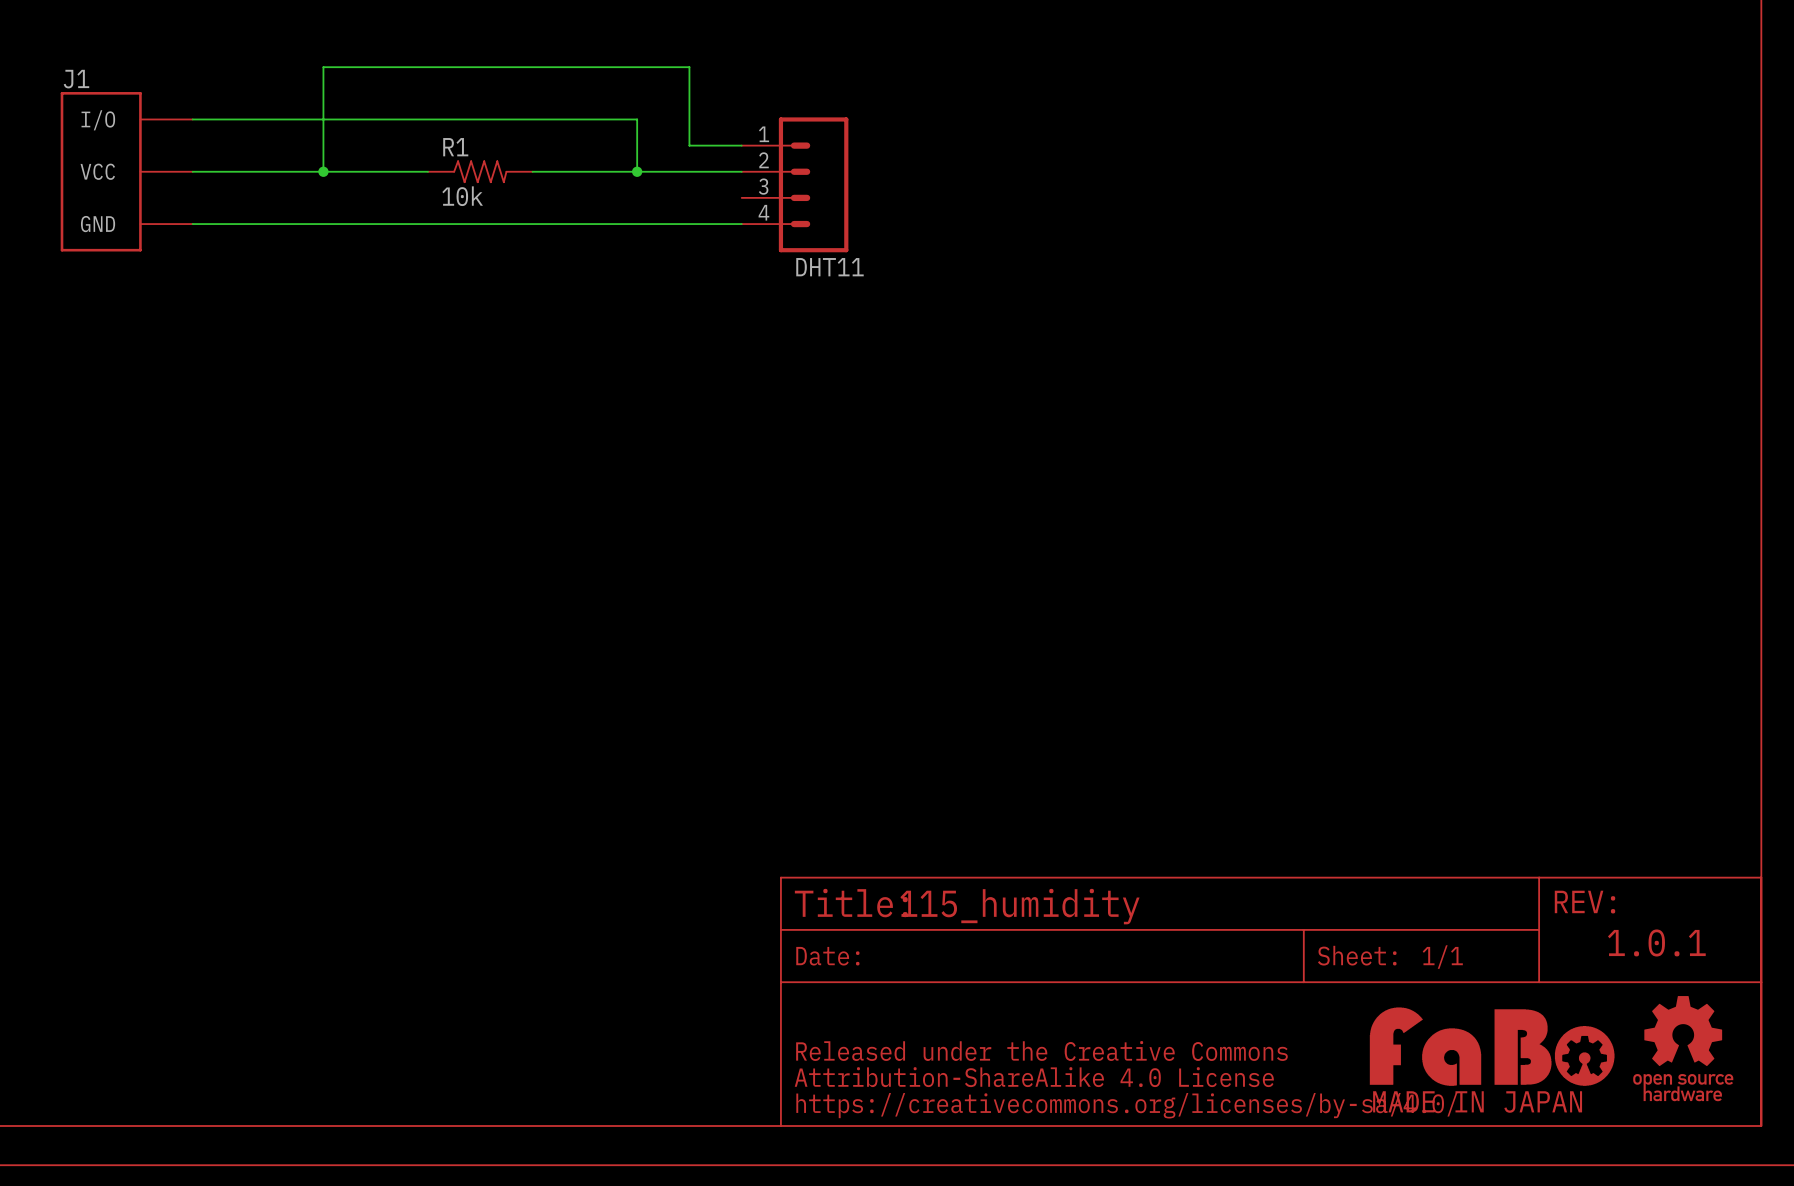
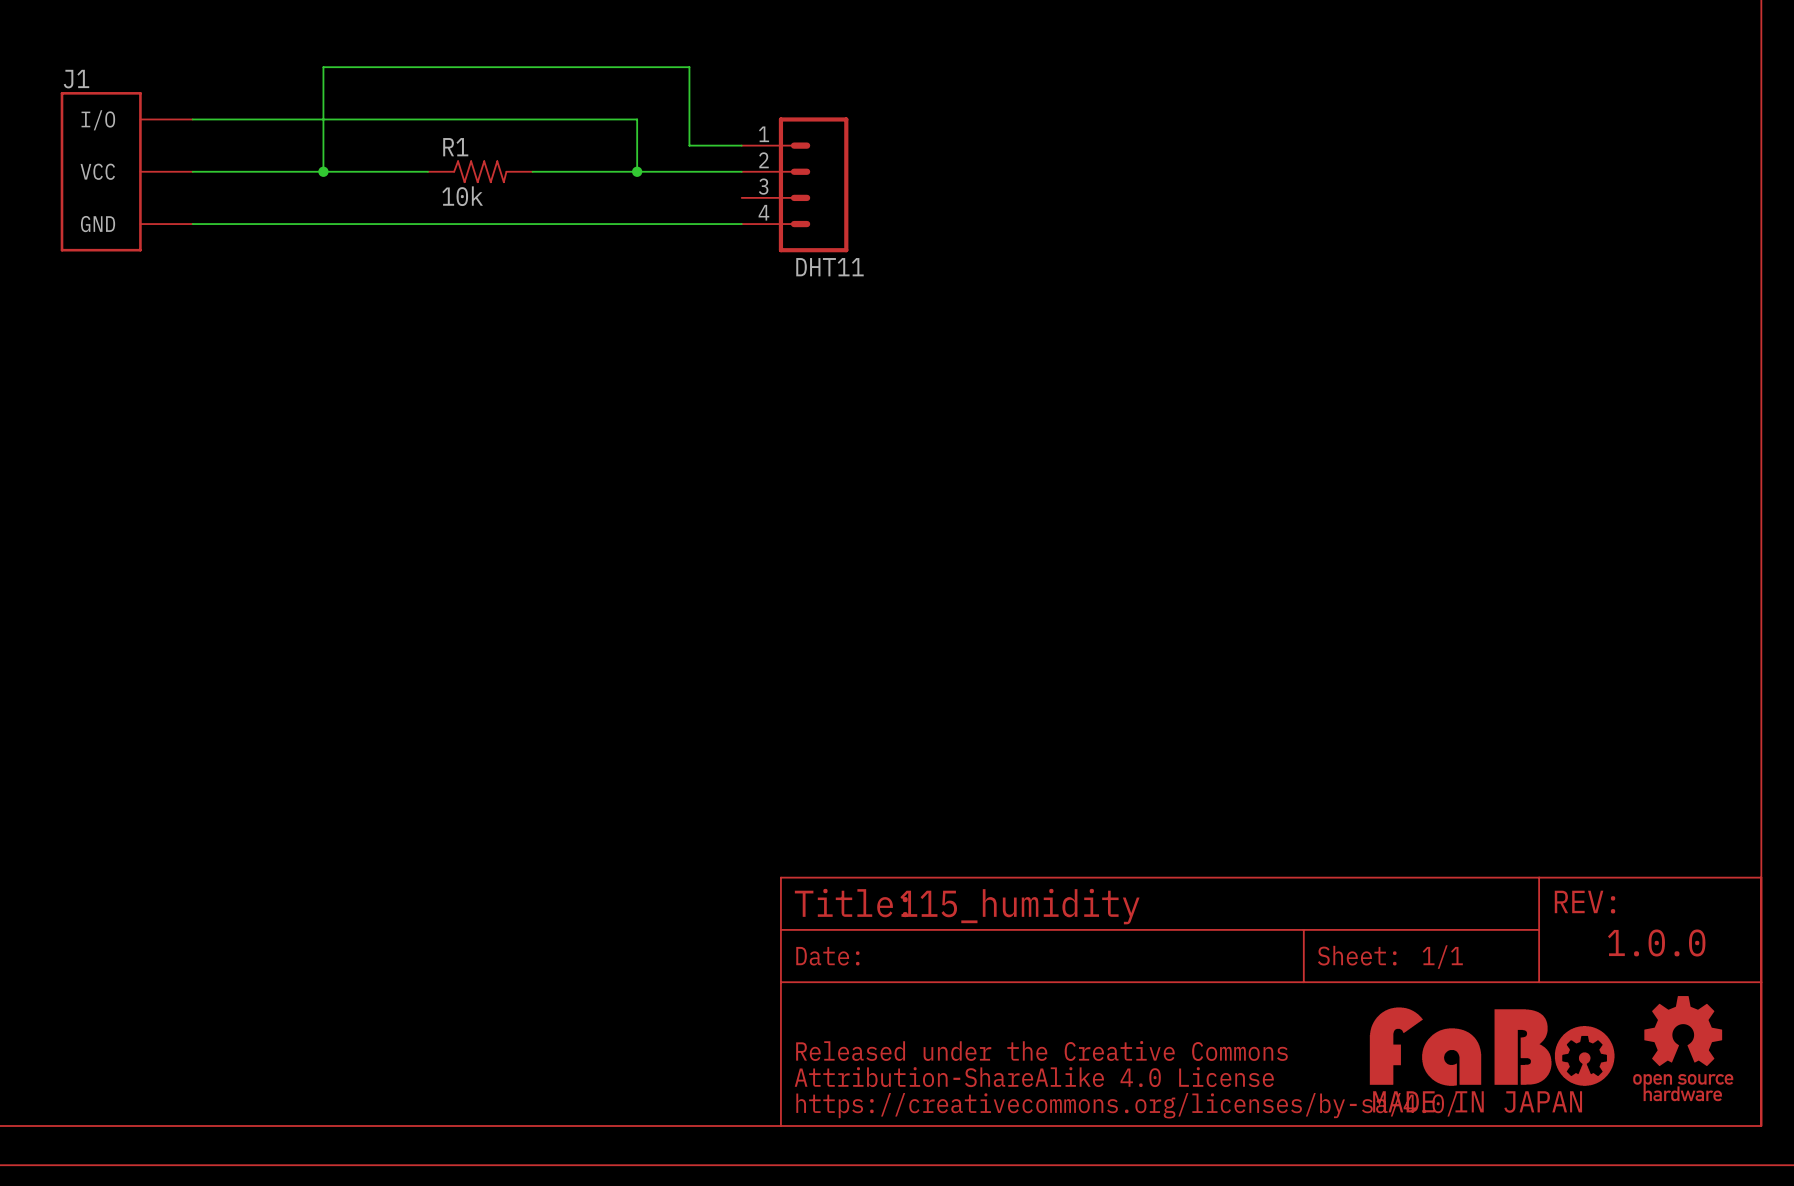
text: 1.0.1 (1656, 942) -> 1.0.0 (1656, 942)

